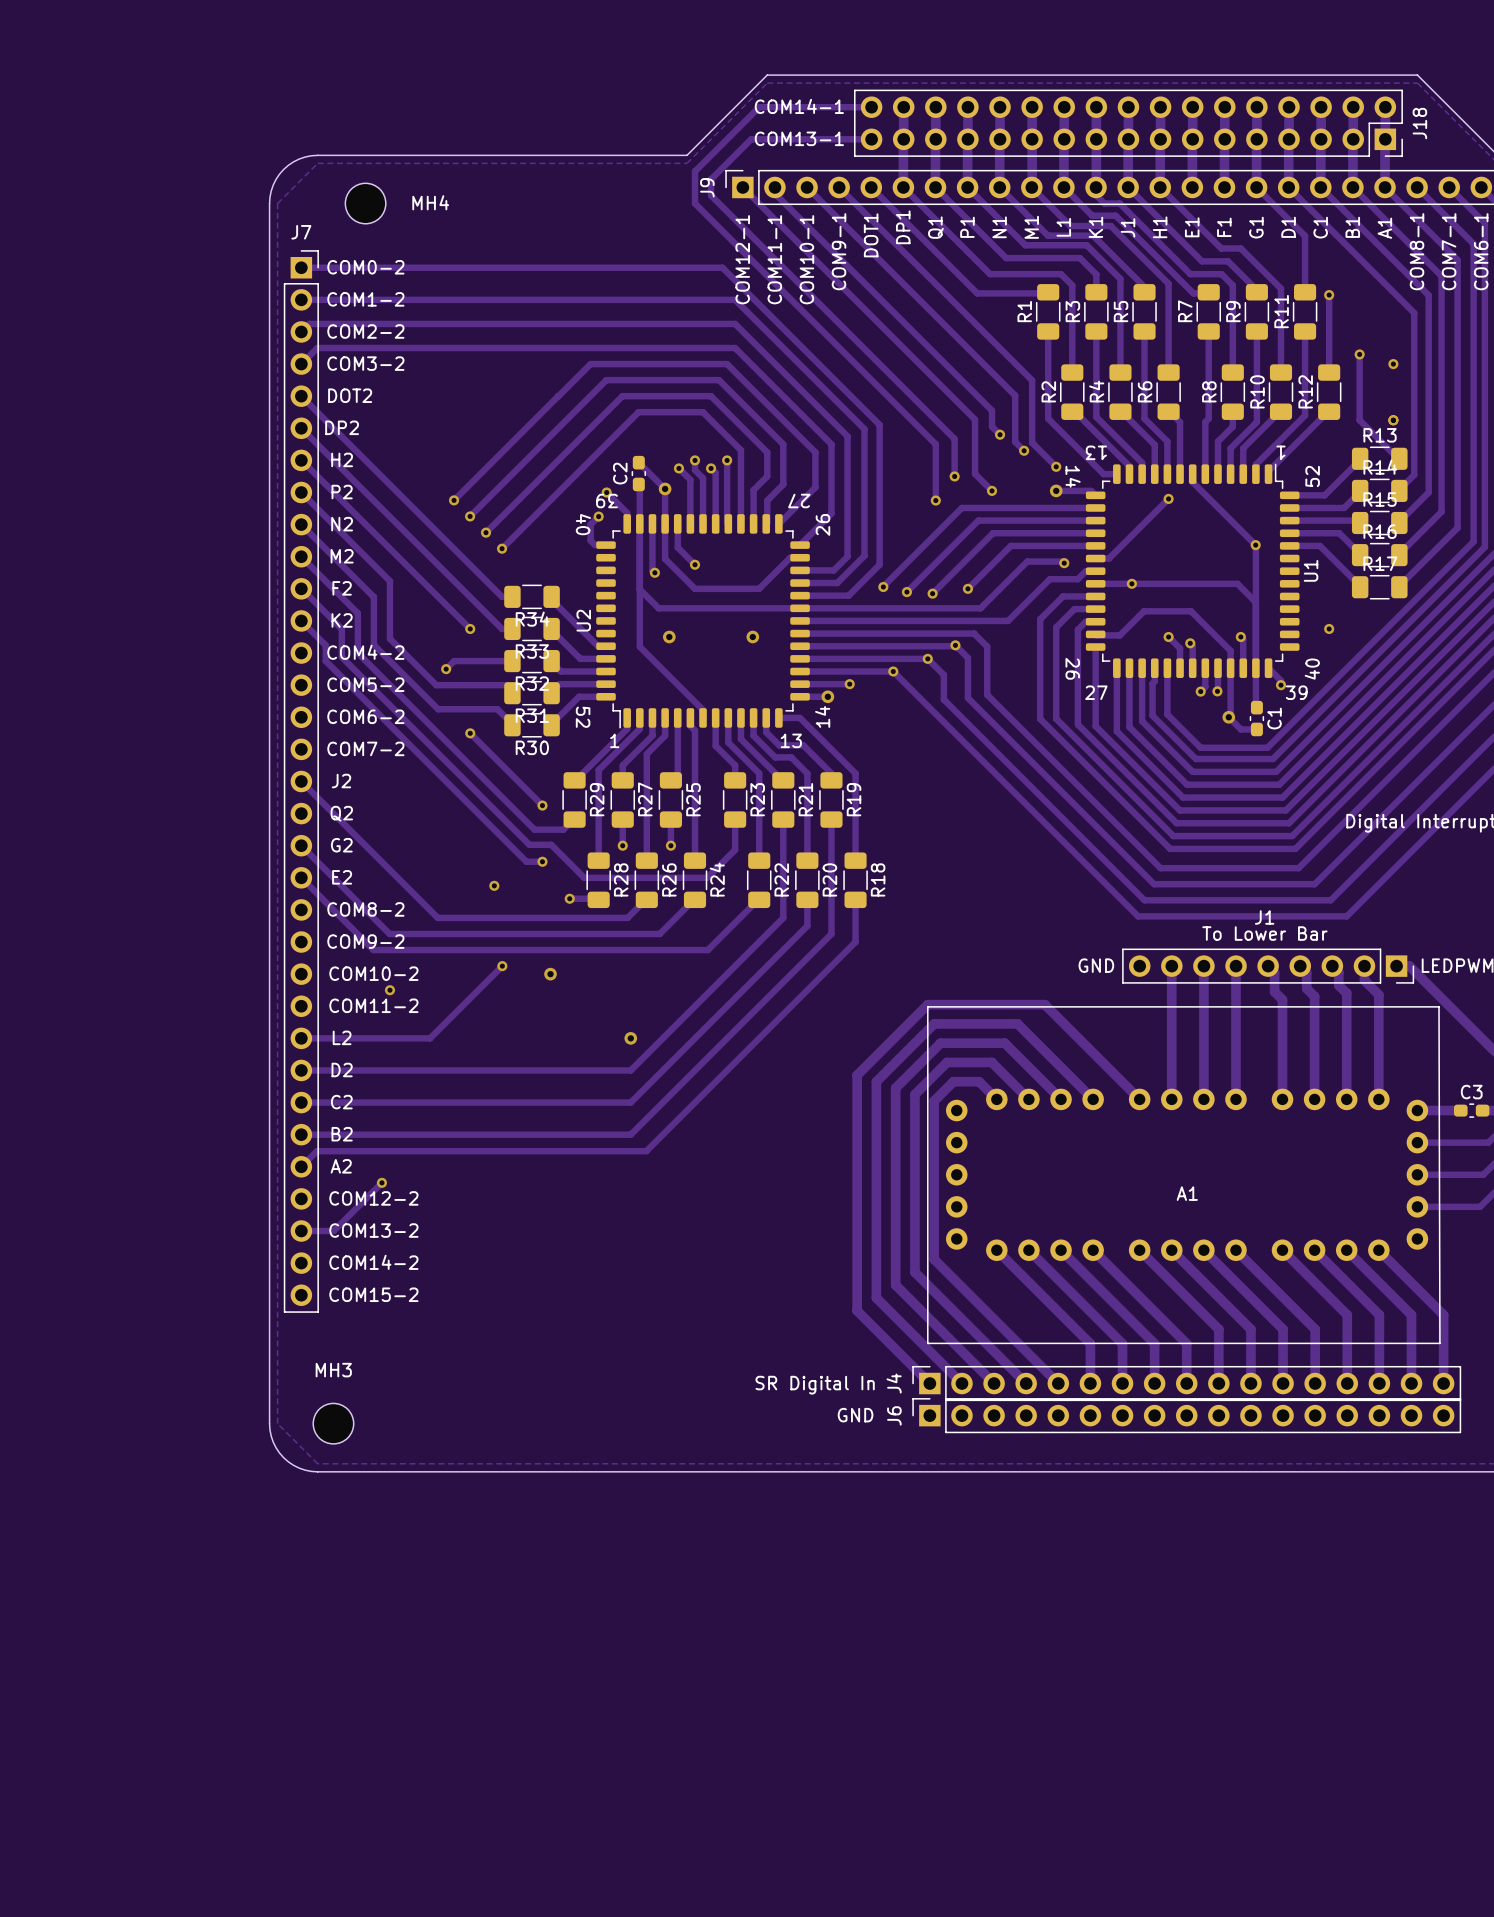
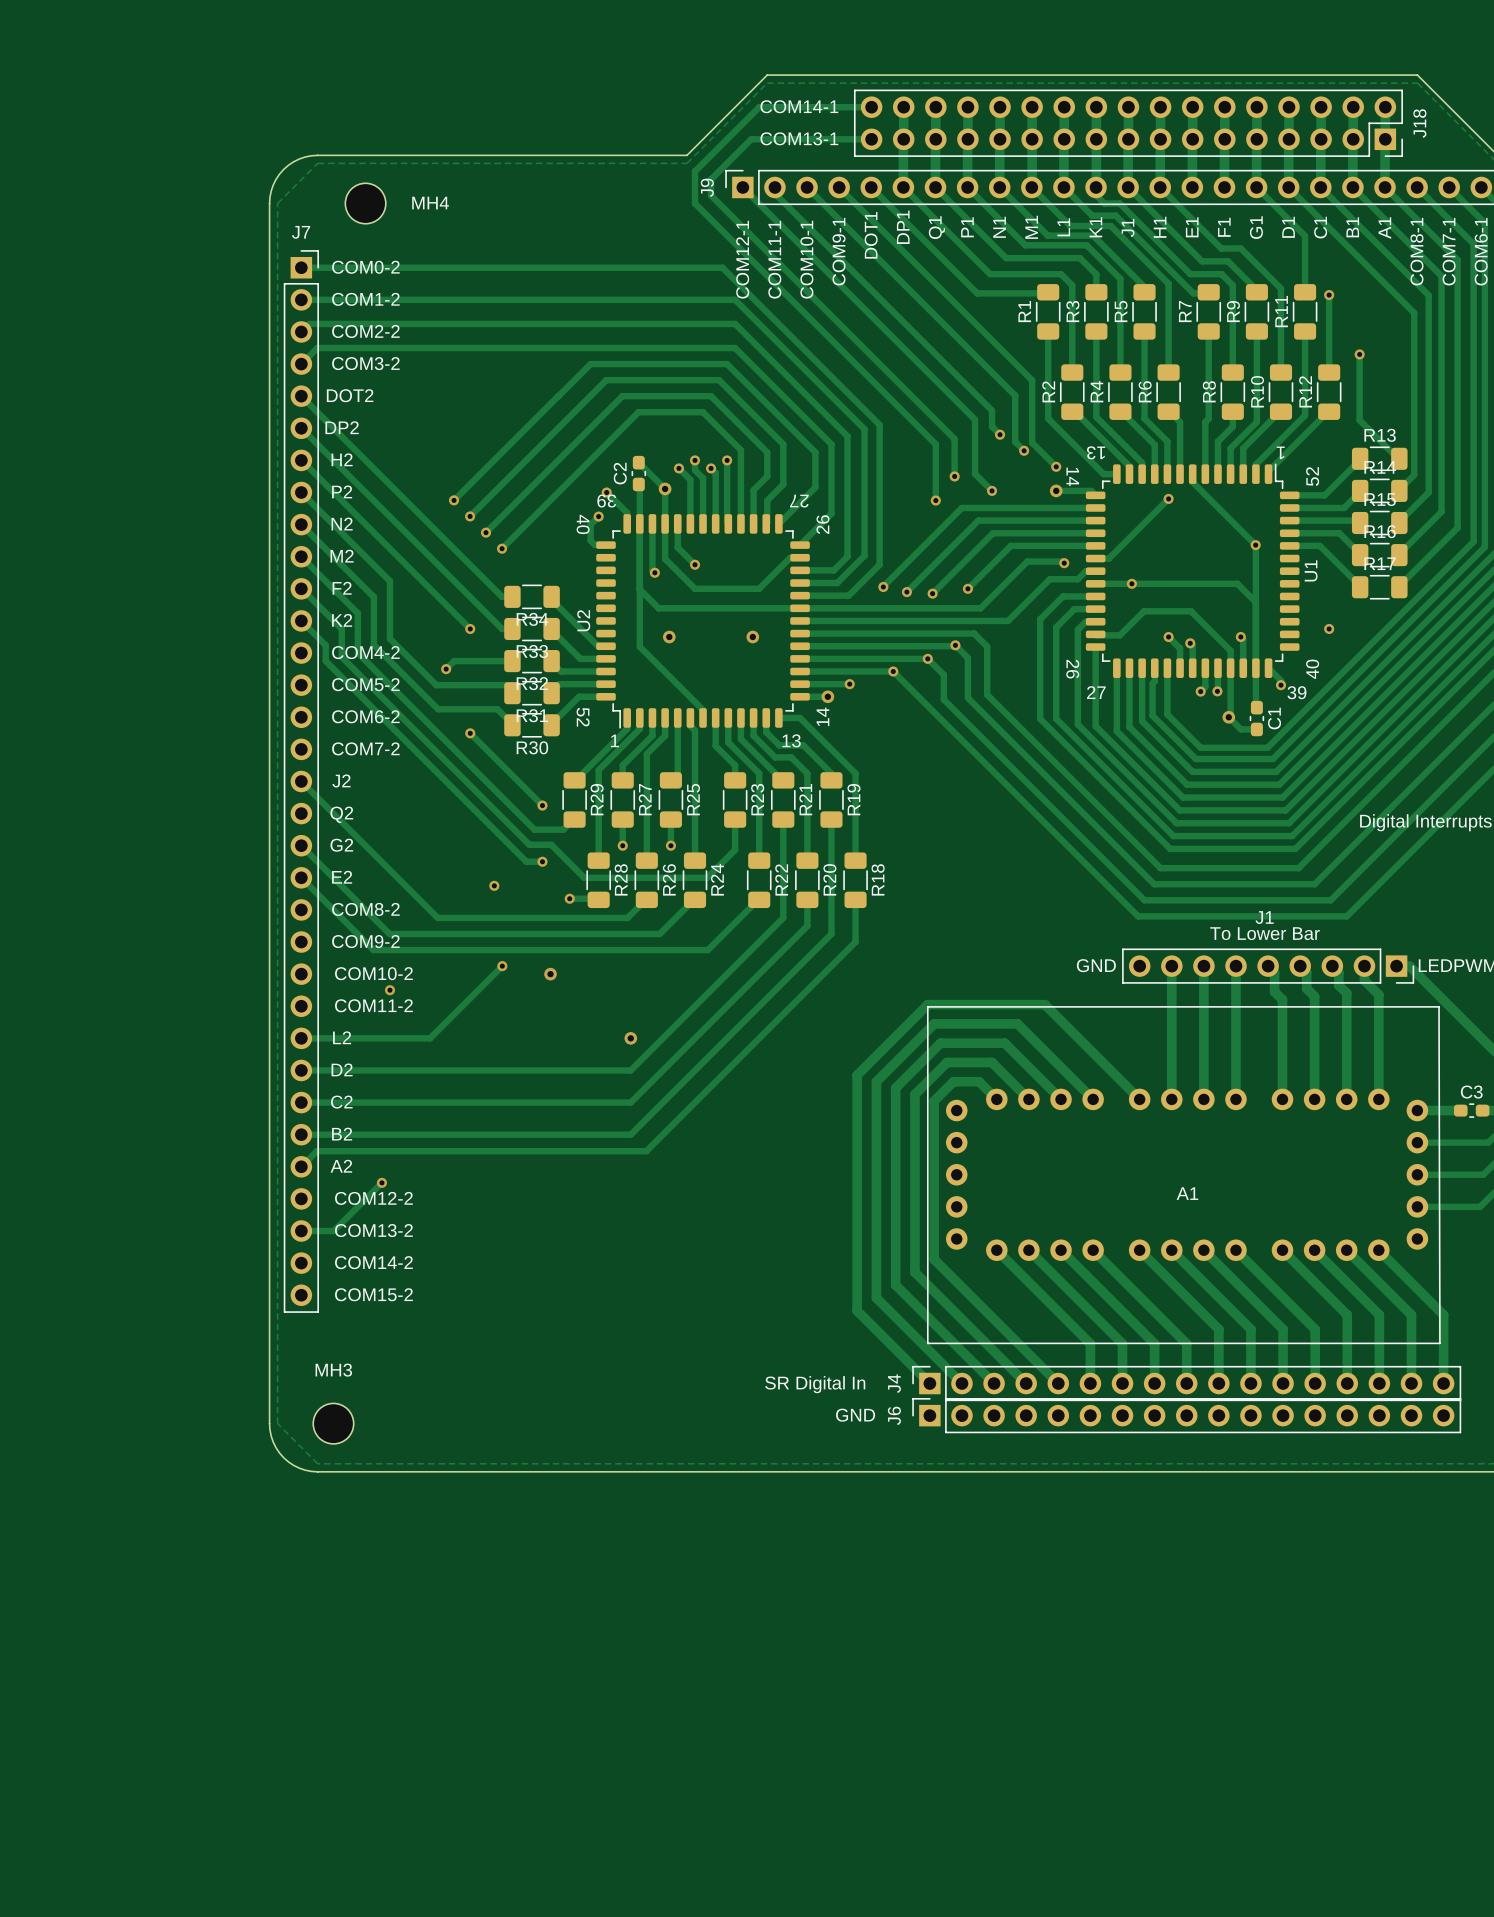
via: (1393, 364) -> none
via: (1393, 420) -> none

